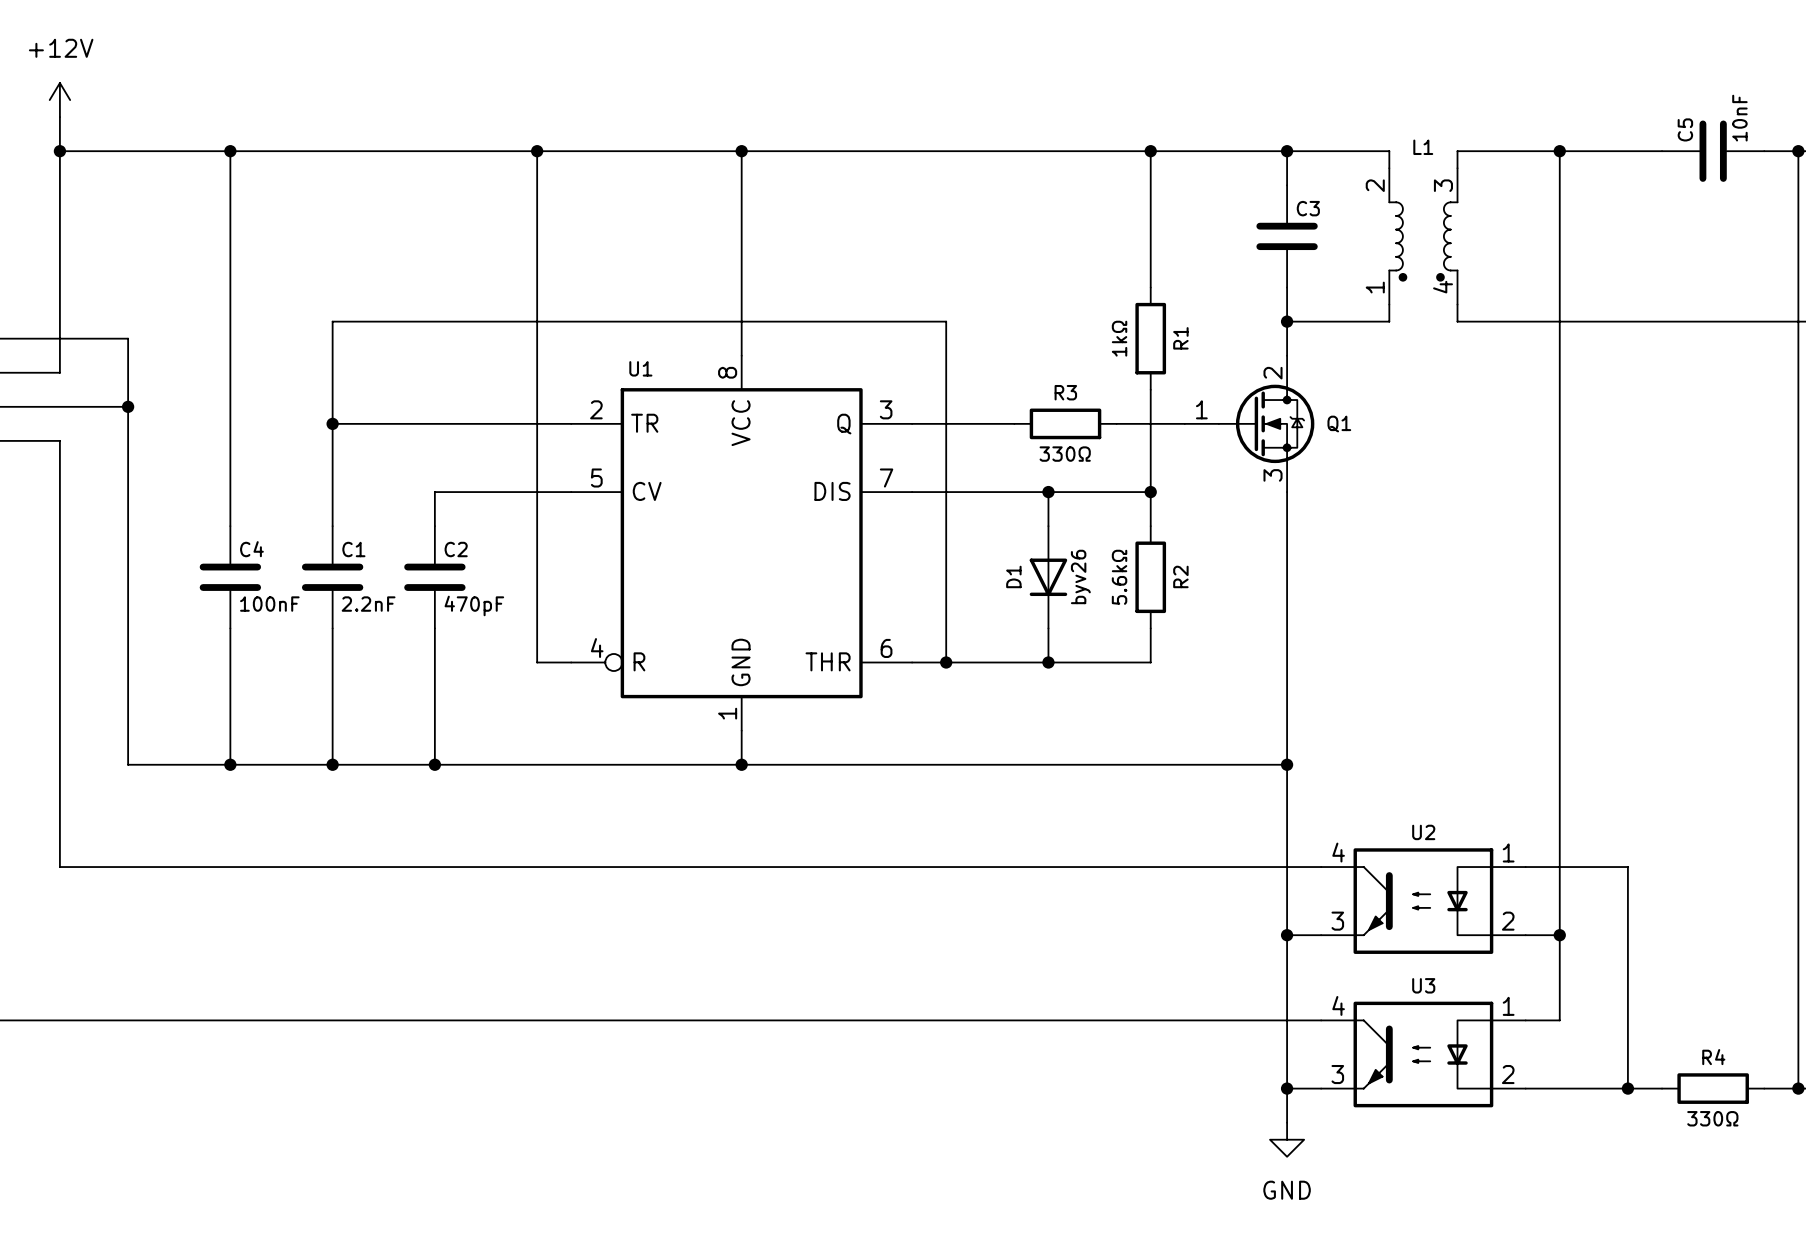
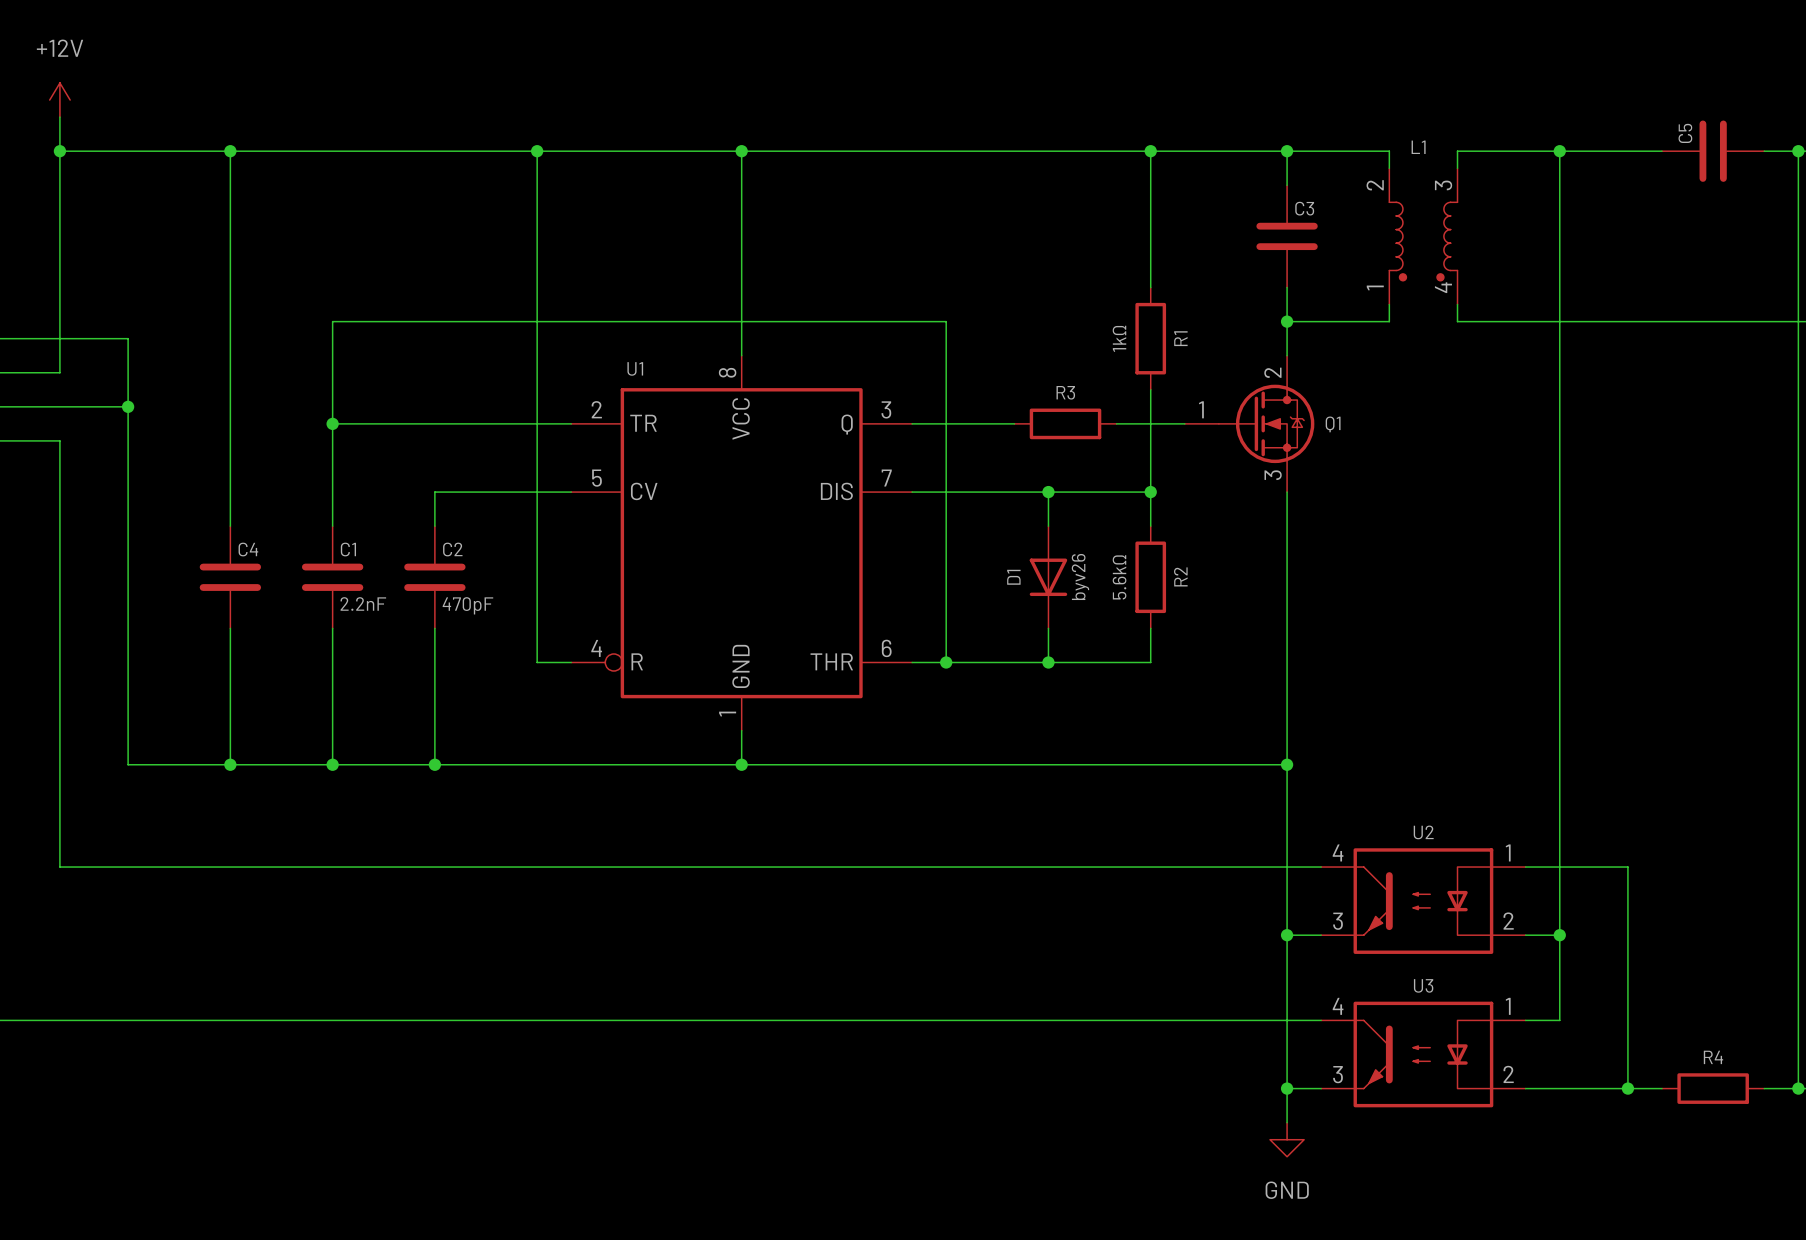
C5 value: 10nF (1739, 118) -> none
R3 value: 330Ω (1065, 454) -> none
C4 value: 100nF (269, 604) -> none
R4 value: 330Ω (1712, 1118) -> none

